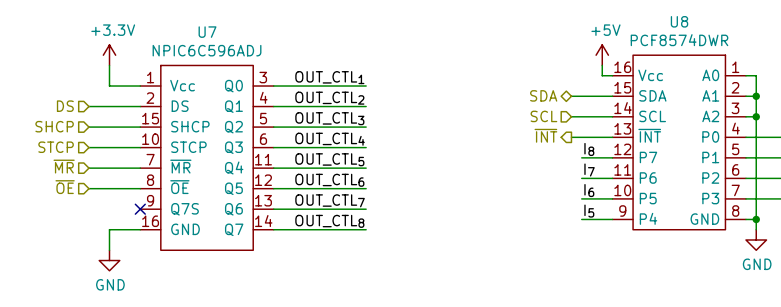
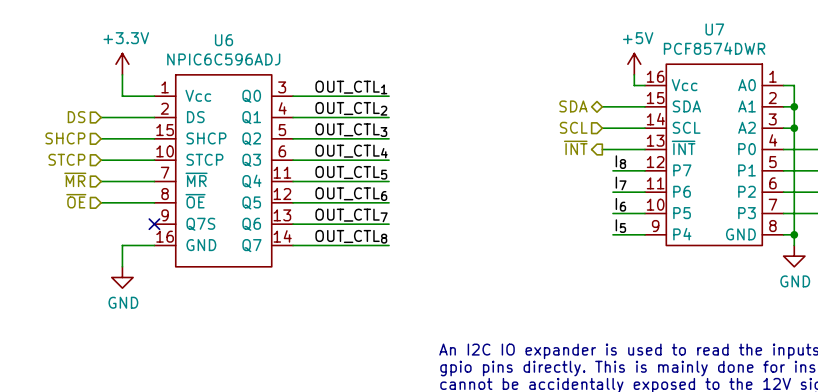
U8 name: U8 (679, 21) -> U7 (714, 29)
U7 name: U7 (207, 32) -> U6 (224, 40)

